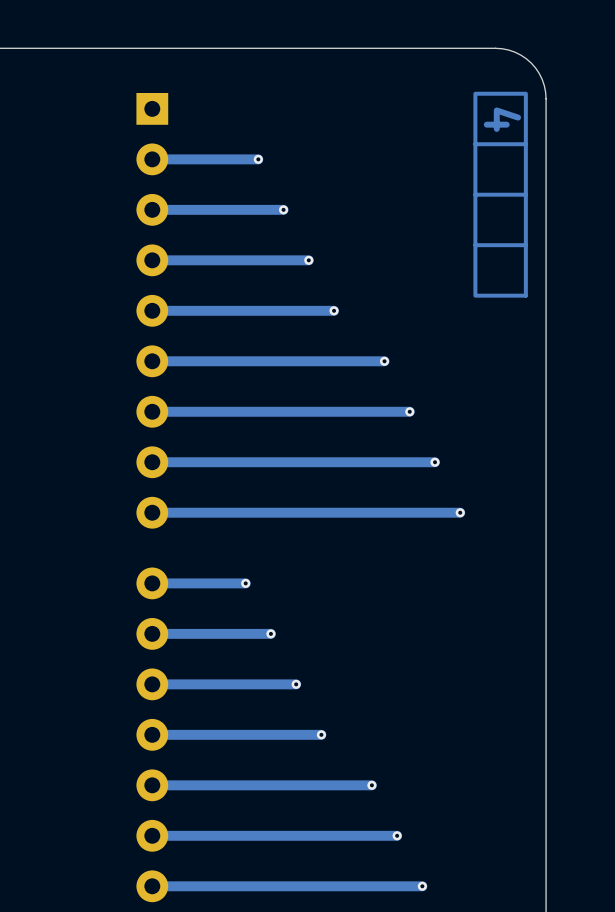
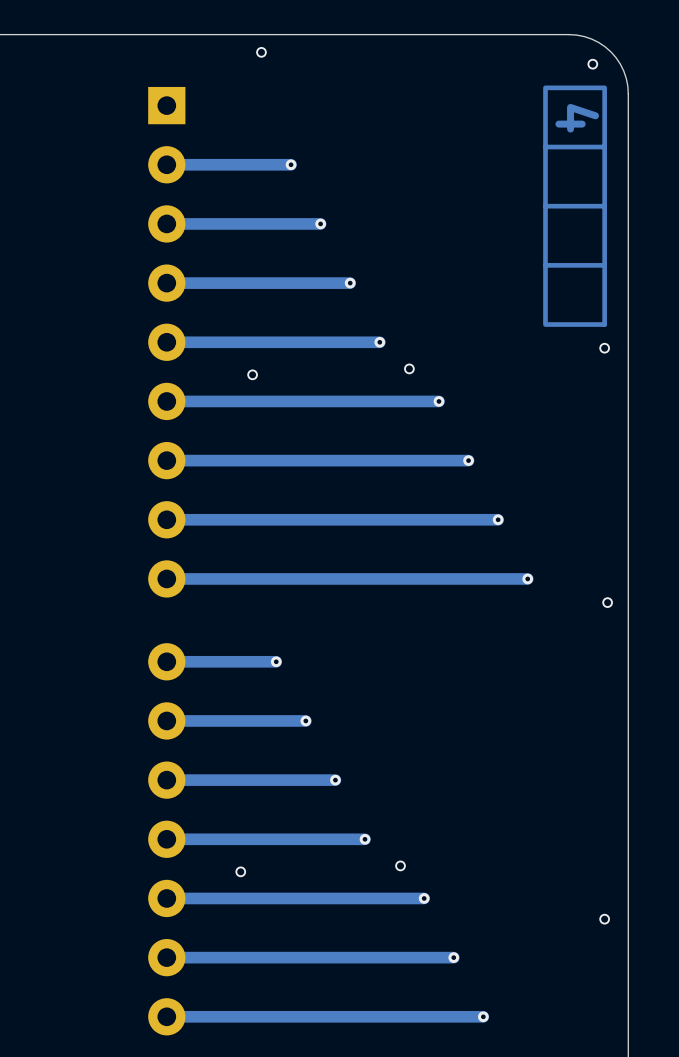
via: none -> (261, 52)
via: none -> (592, 64)
via: none -> (604, 348)
via: none -> (409, 368)
via: none -> (252, 374)
via: none -> (607, 602)
via: none -> (400, 865)
via: none -> (240, 871)
via: none -> (604, 919)

